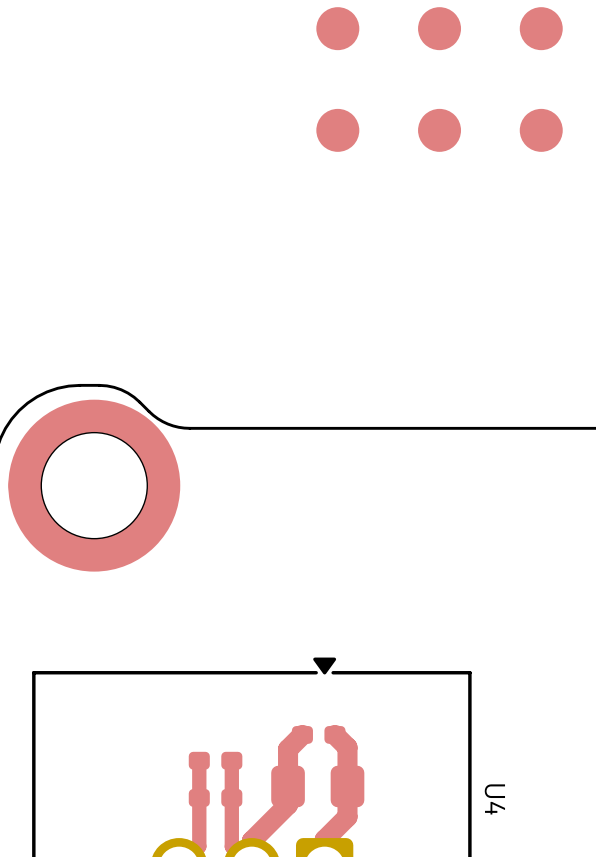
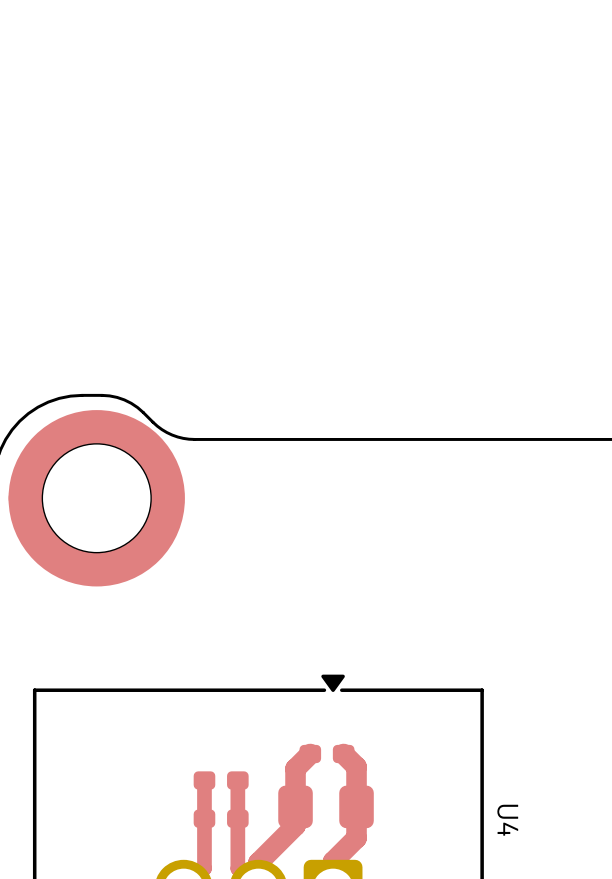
part: (337, 28) -> none
part: (439, 28) -> none
part: (541, 28) -> none
part: (337, 130) -> none
part: (439, 130) -> none
part: (541, 130) -> none

